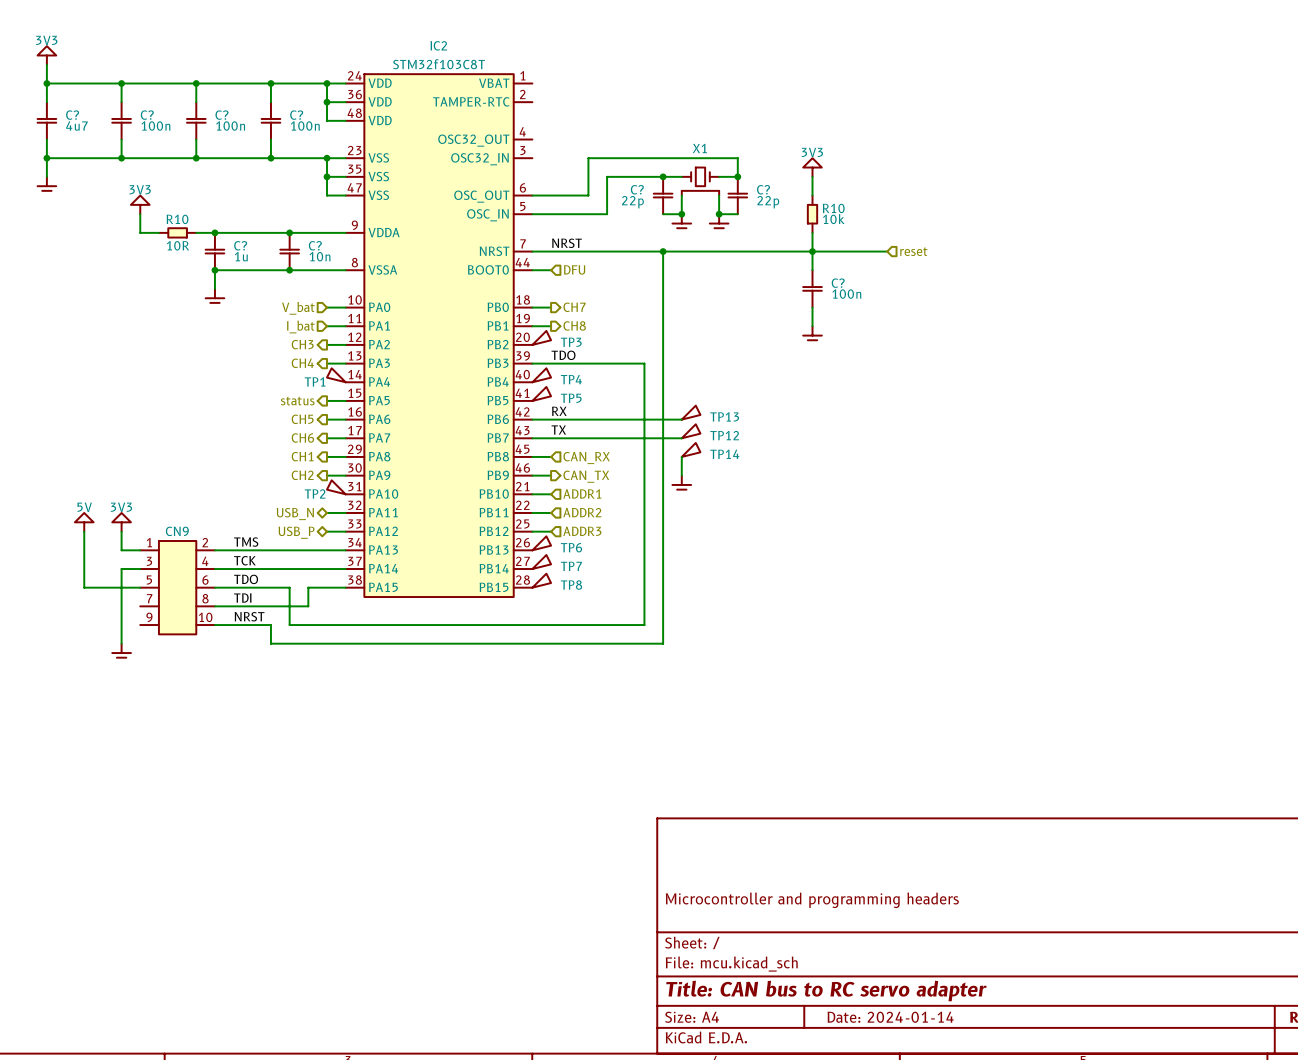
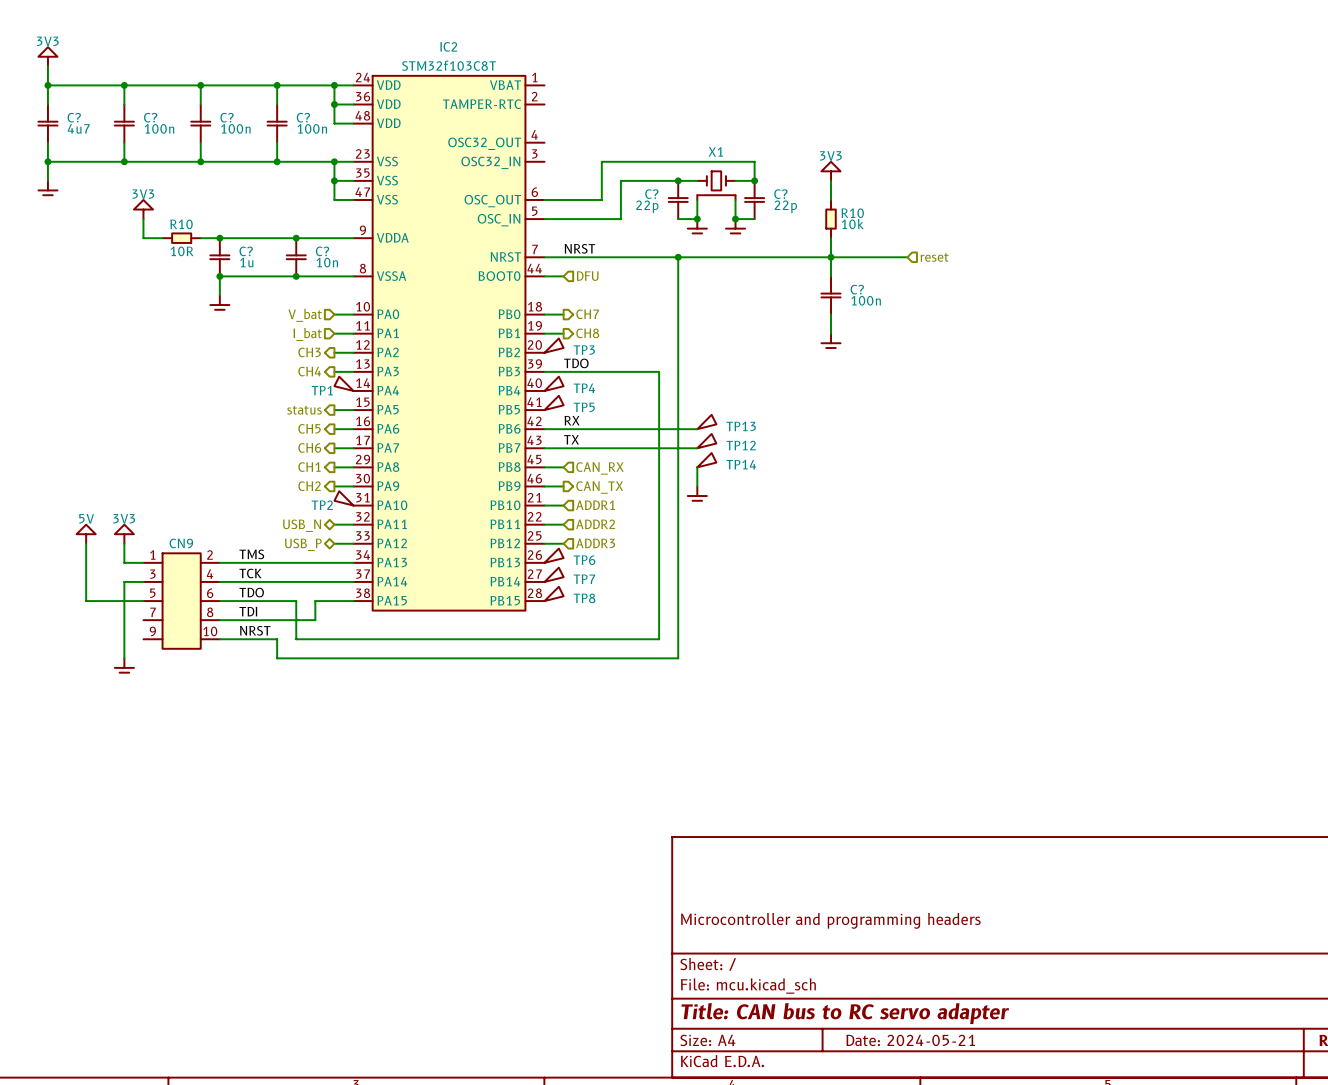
title block: Date: 2024-01-14 (890, 1017) -> Date: 2024-05-21 (910, 1040)

